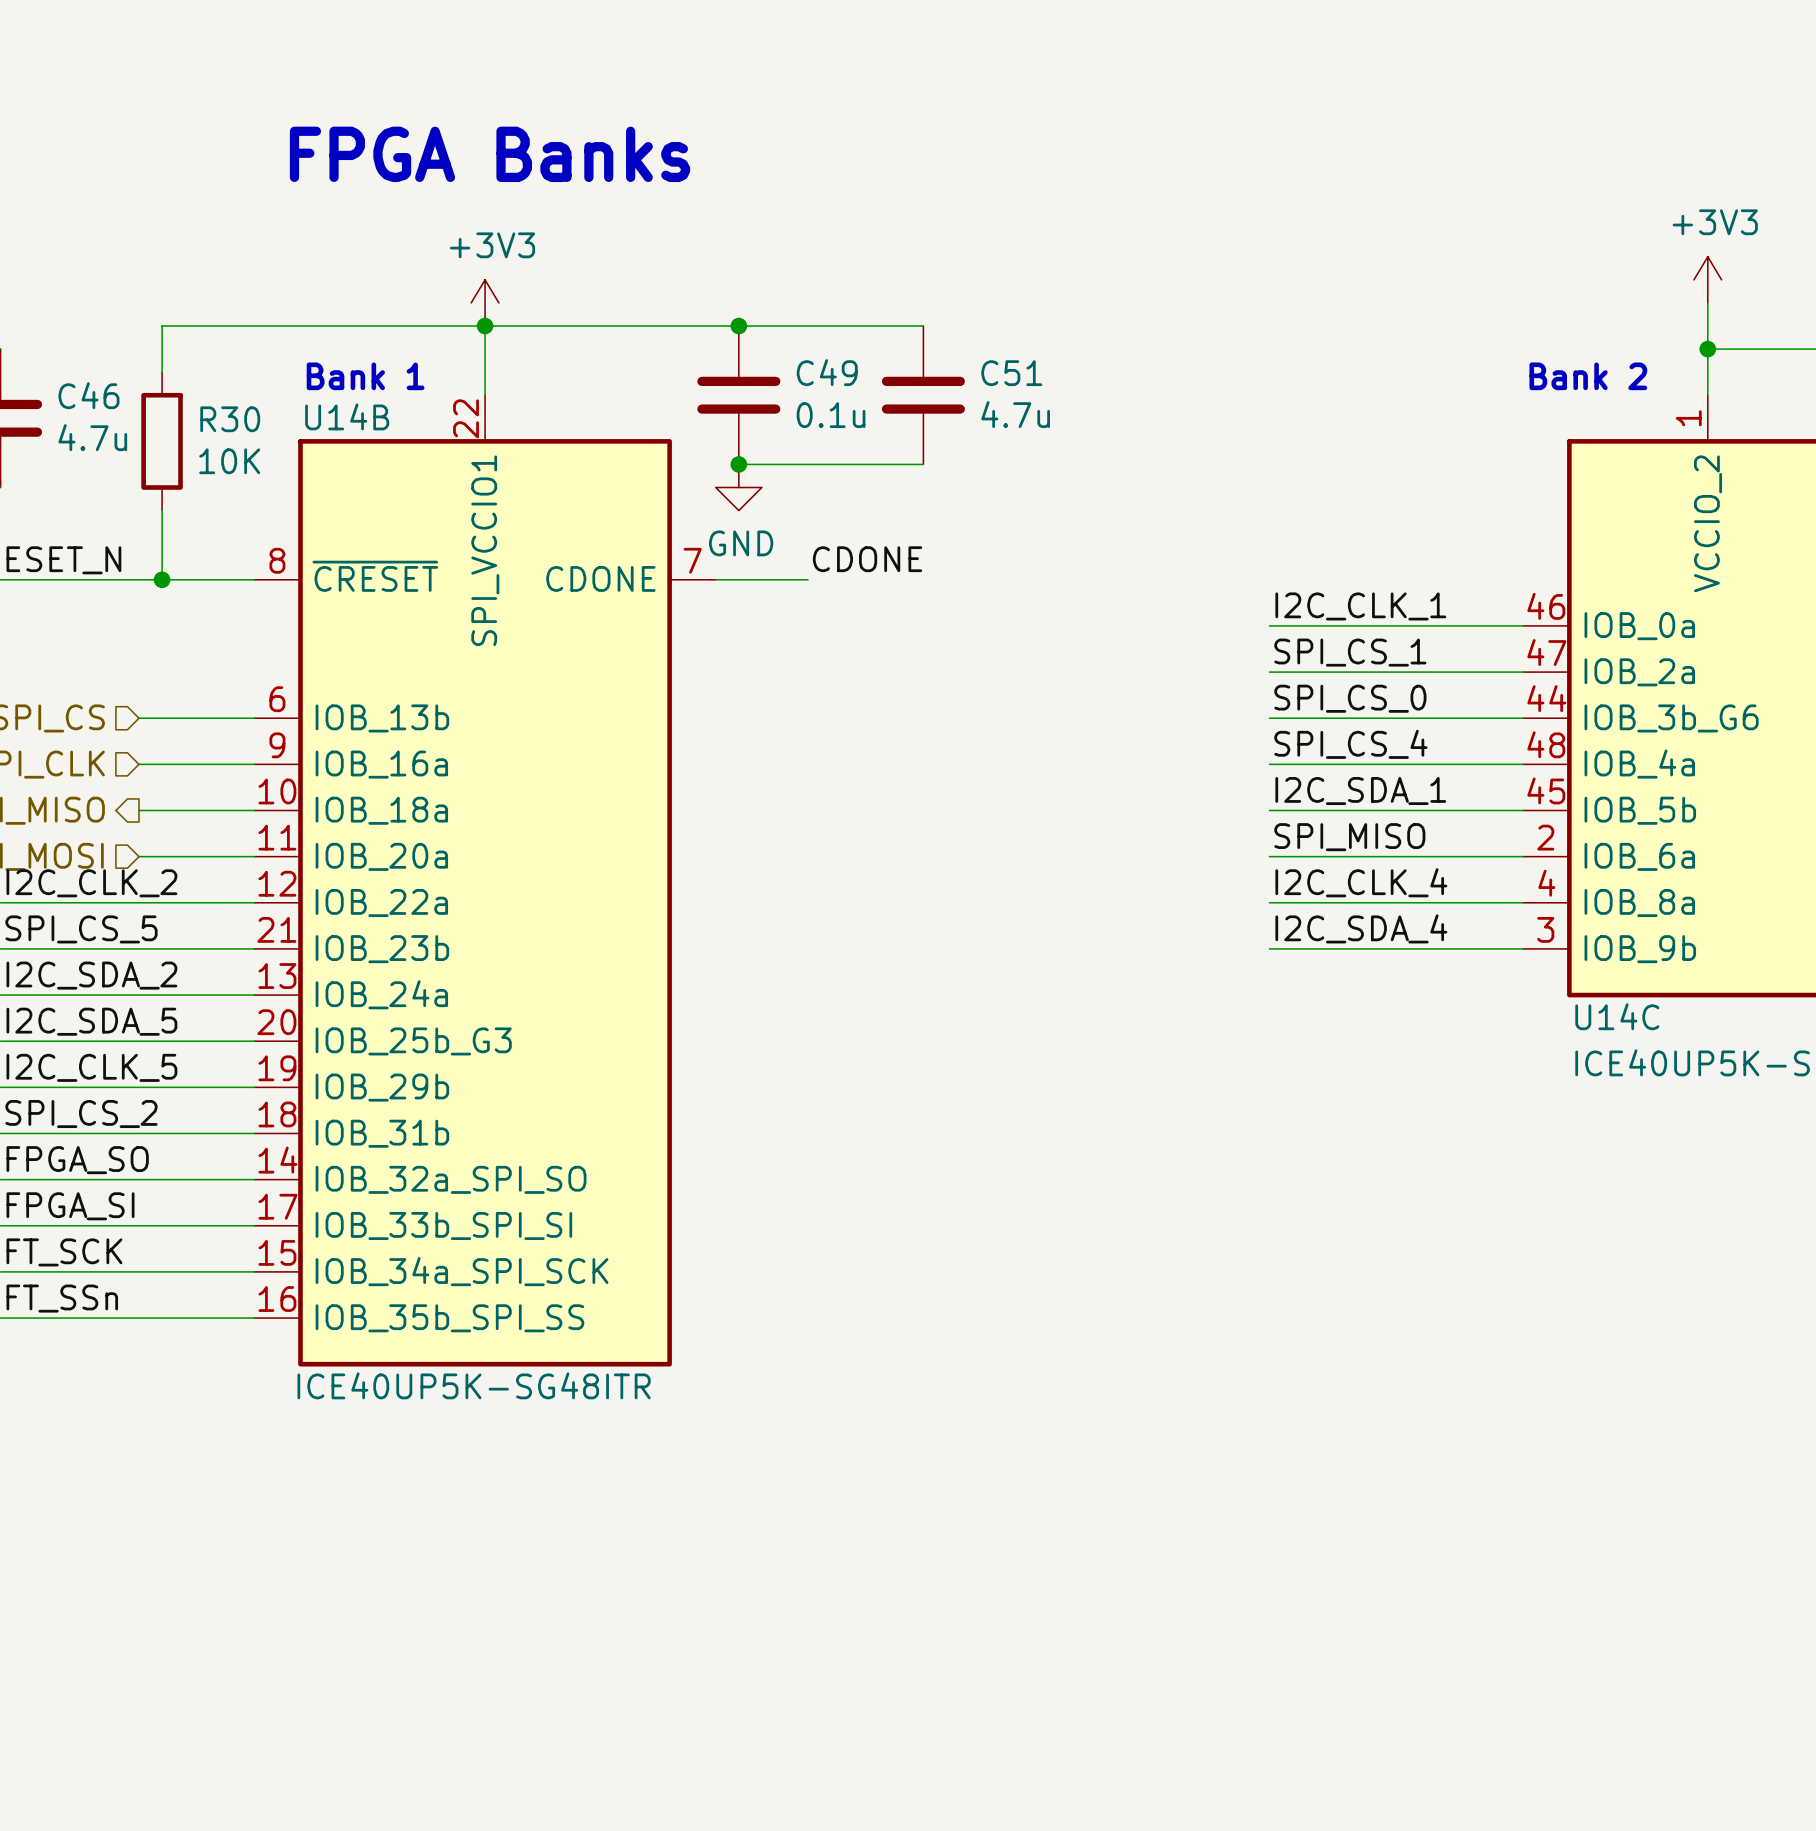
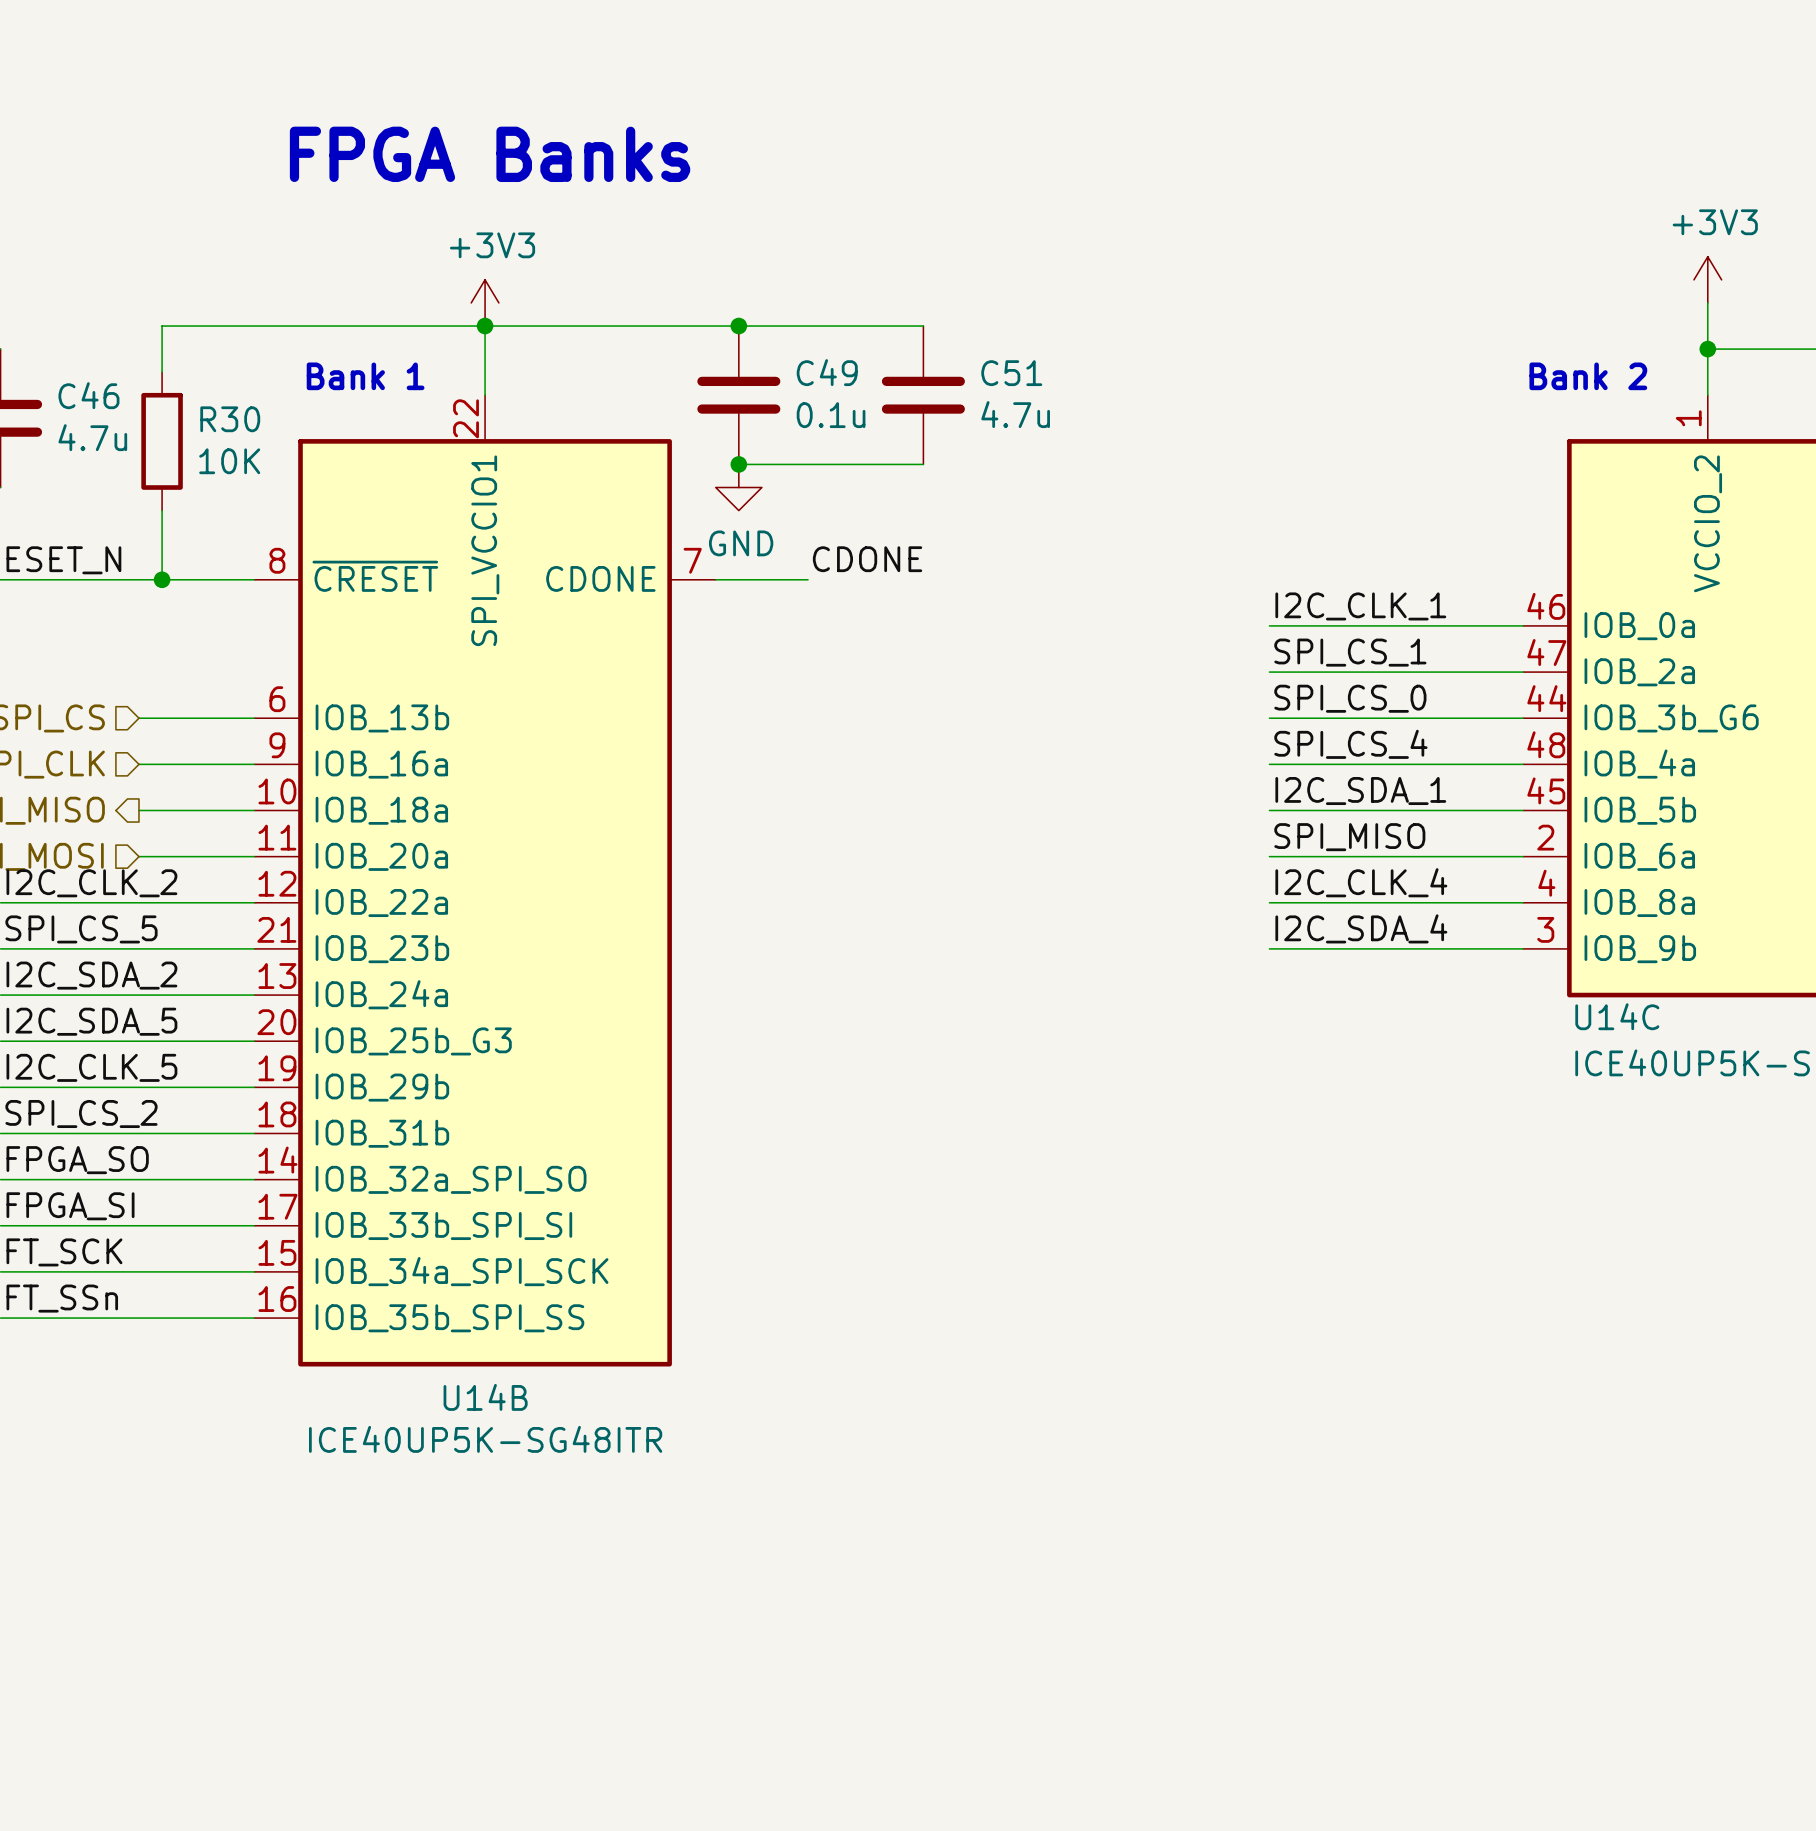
U14B name position: U14B (347, 416) -> U14B (485, 1397)
U14B value position: ICE40UP5K-SG48ITR (474, 1385) -> ICE40UP5K-SG48ITR (485, 1439)

